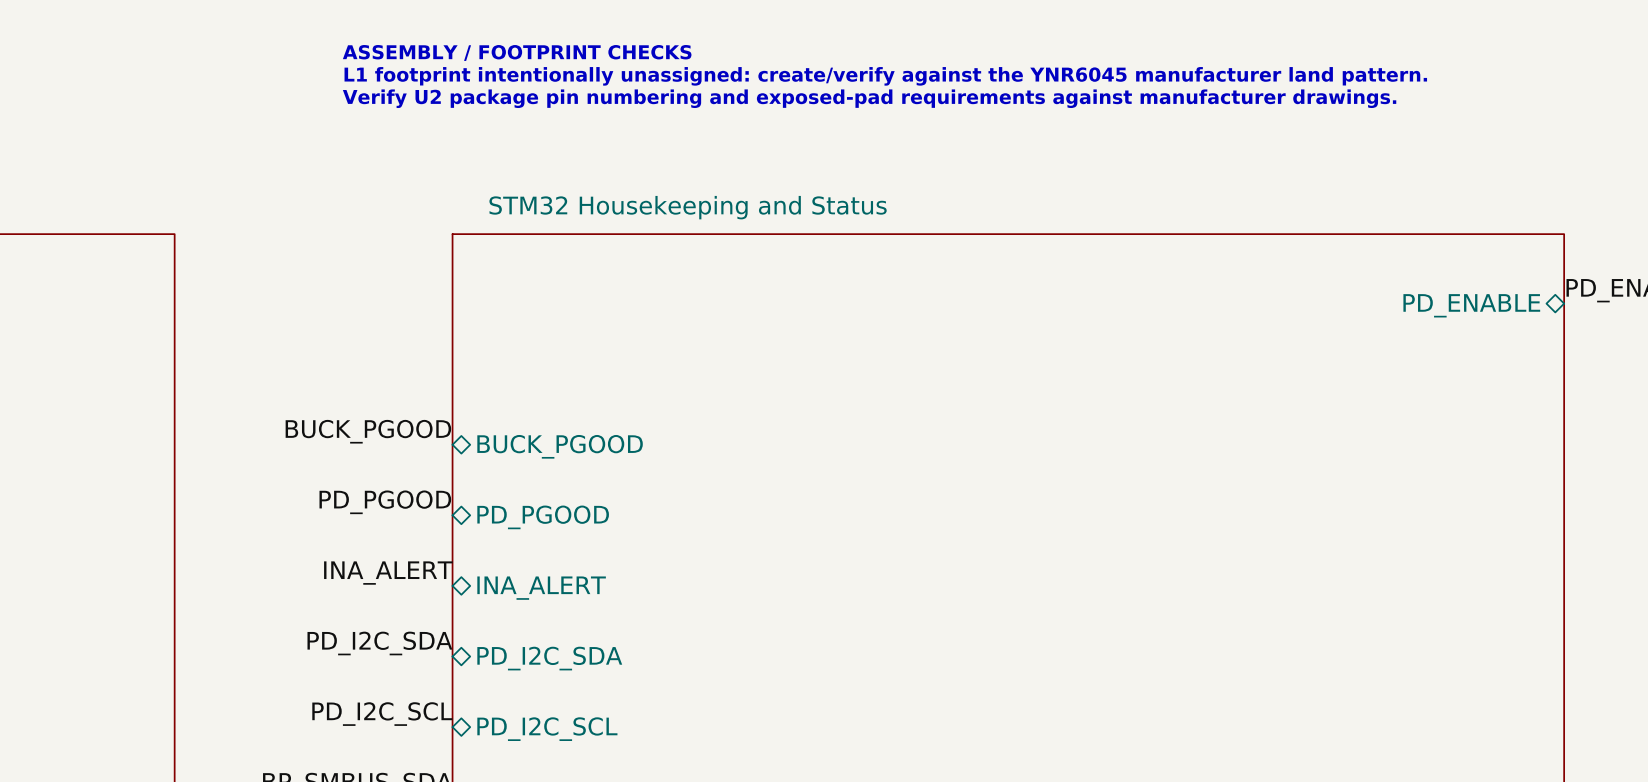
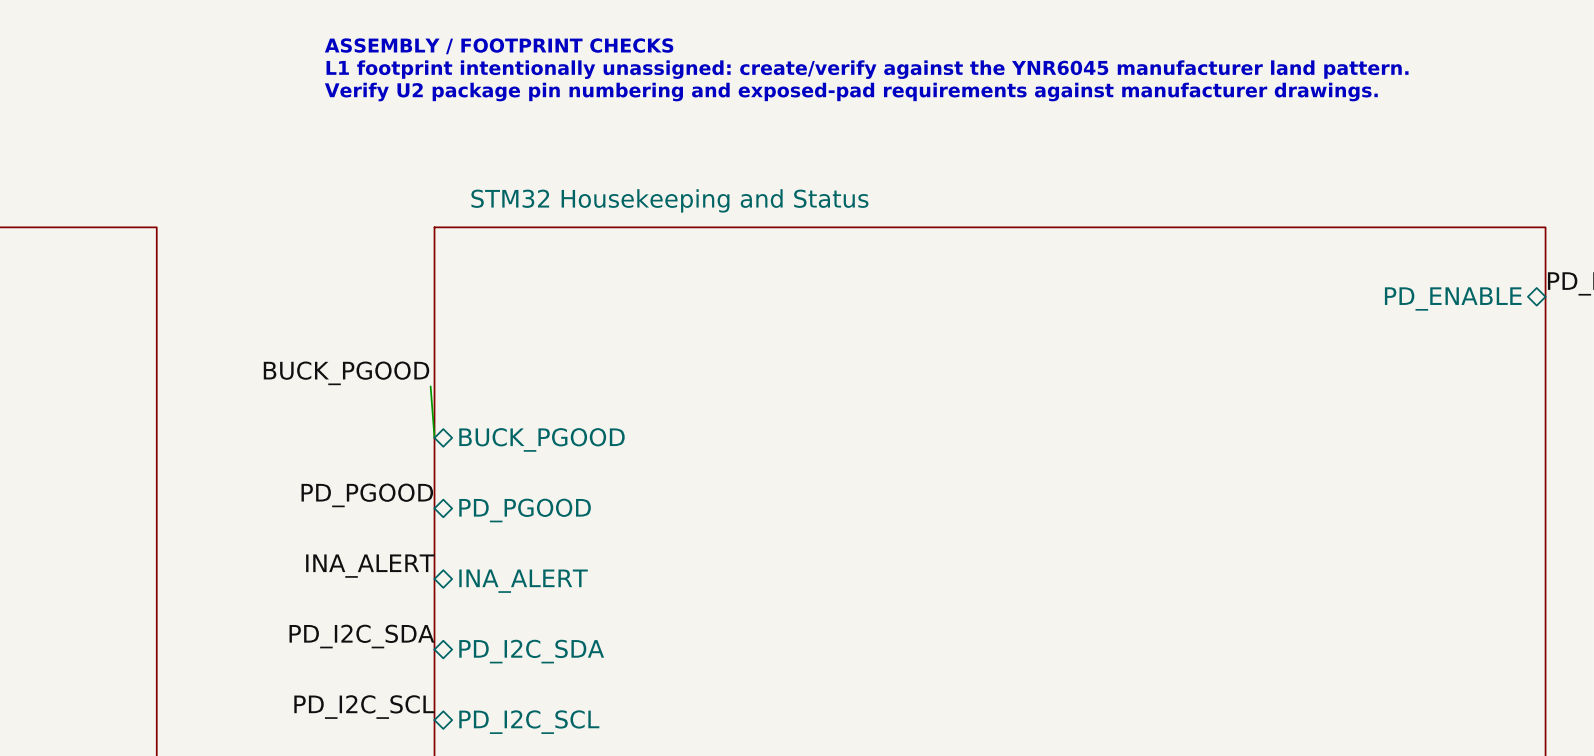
wire: none -> (430, 386) (434, 437)
label position: BUCK_PGOOD (368, 431) -> BUCK_PGOOD (346, 373)

